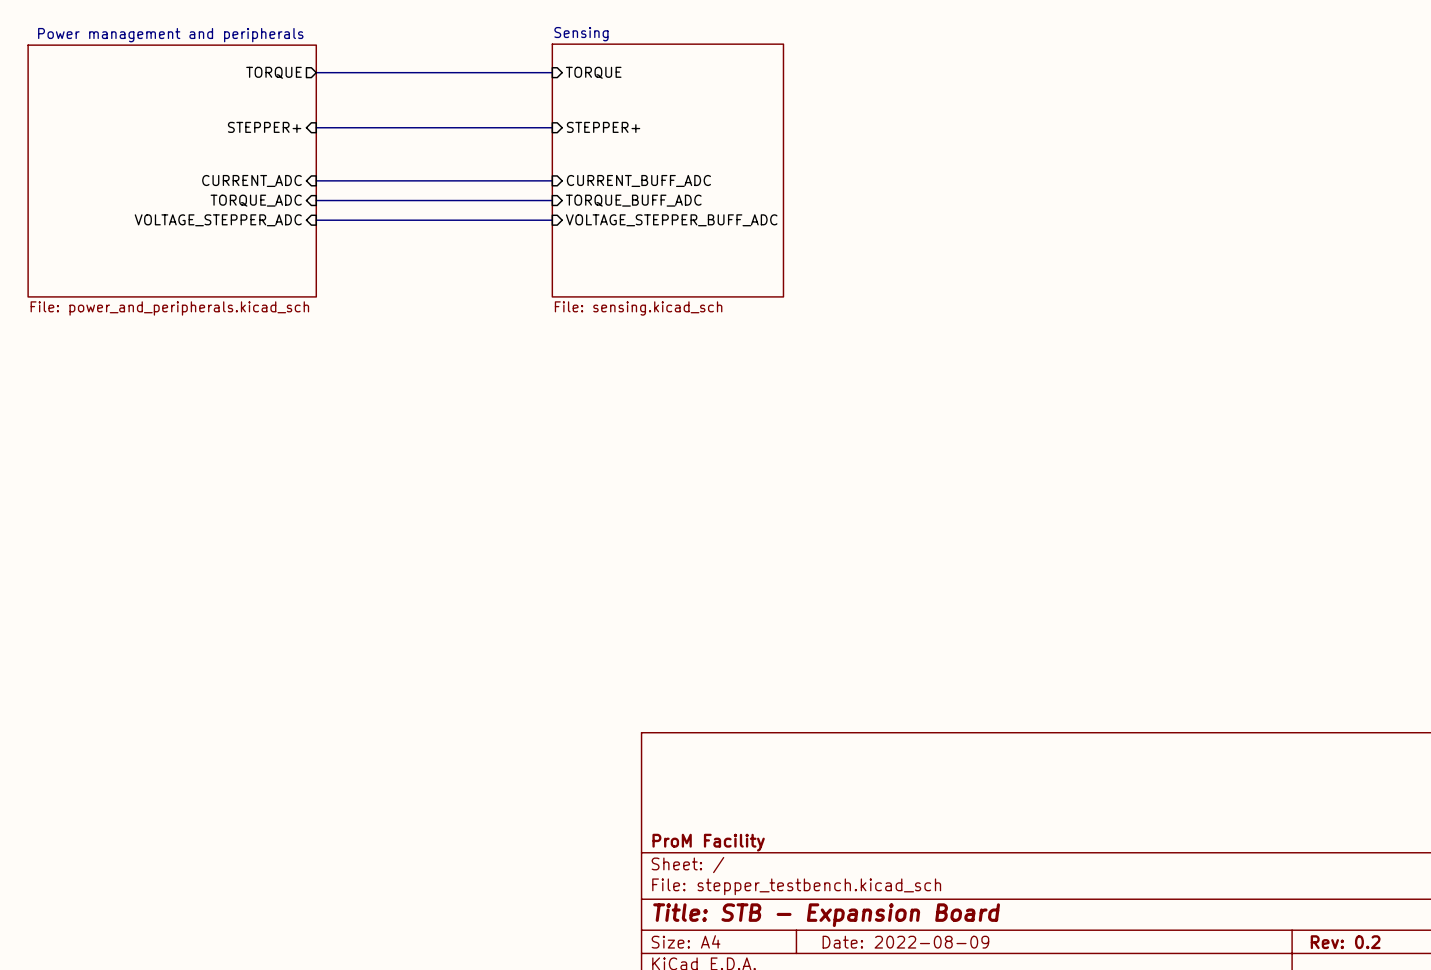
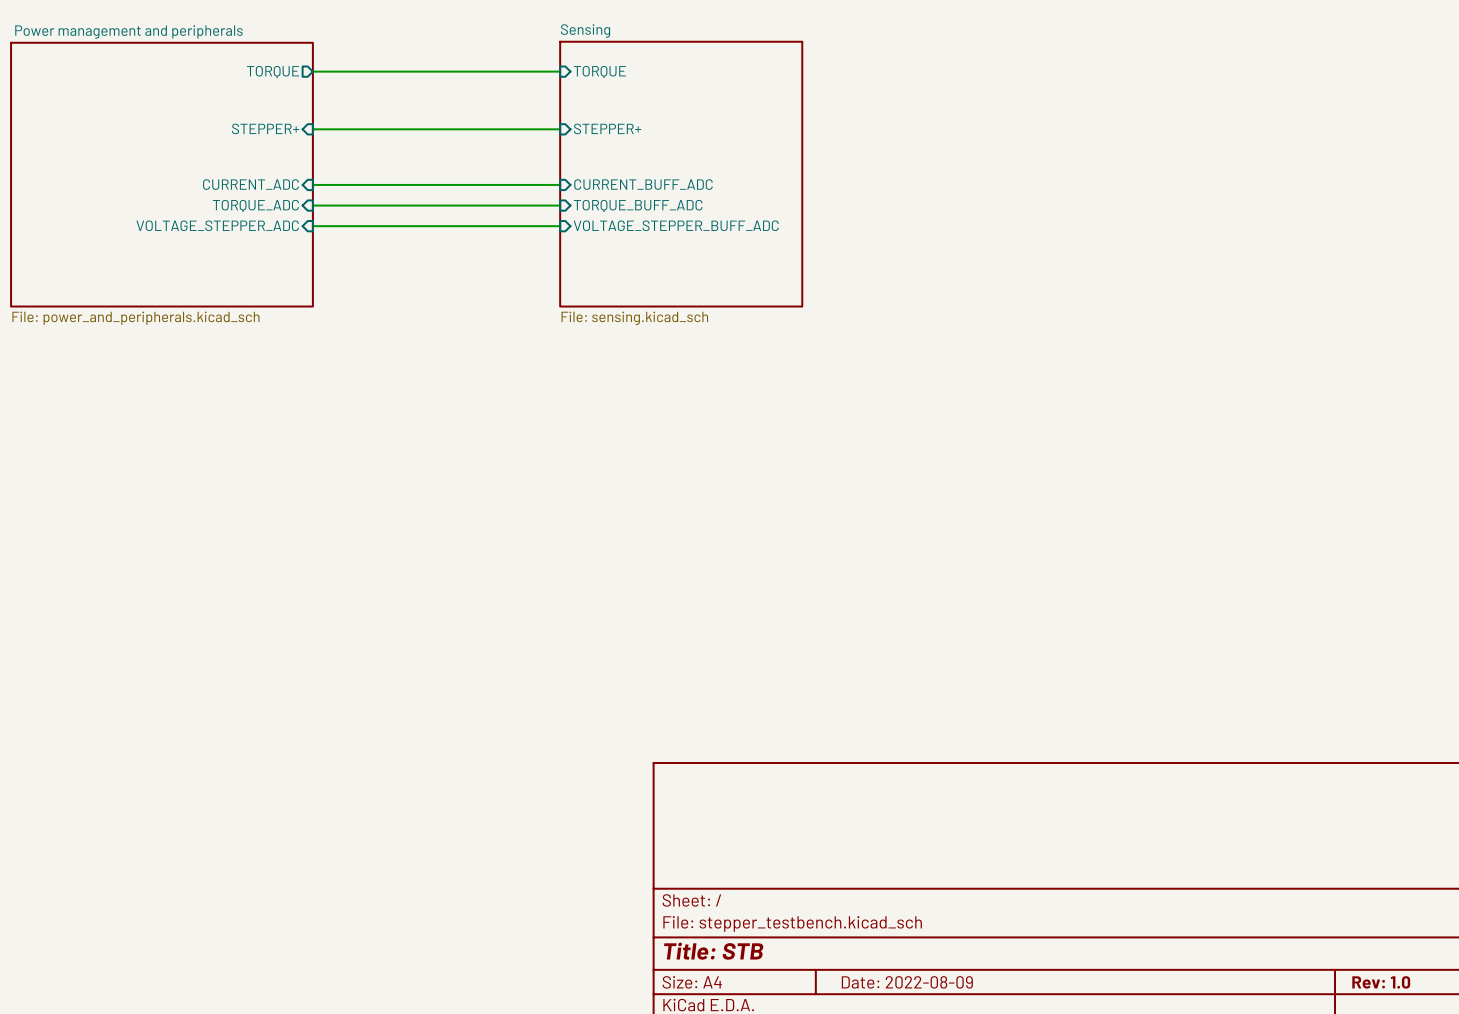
title block: ProM Facility (708, 842) -> none
title block: Title: STB - Expansion Board (826, 915) -> Title: STB (713, 951)
title block: Rev: 0.2 (1345, 942) -> Rev: 1.0 (1381, 982)

